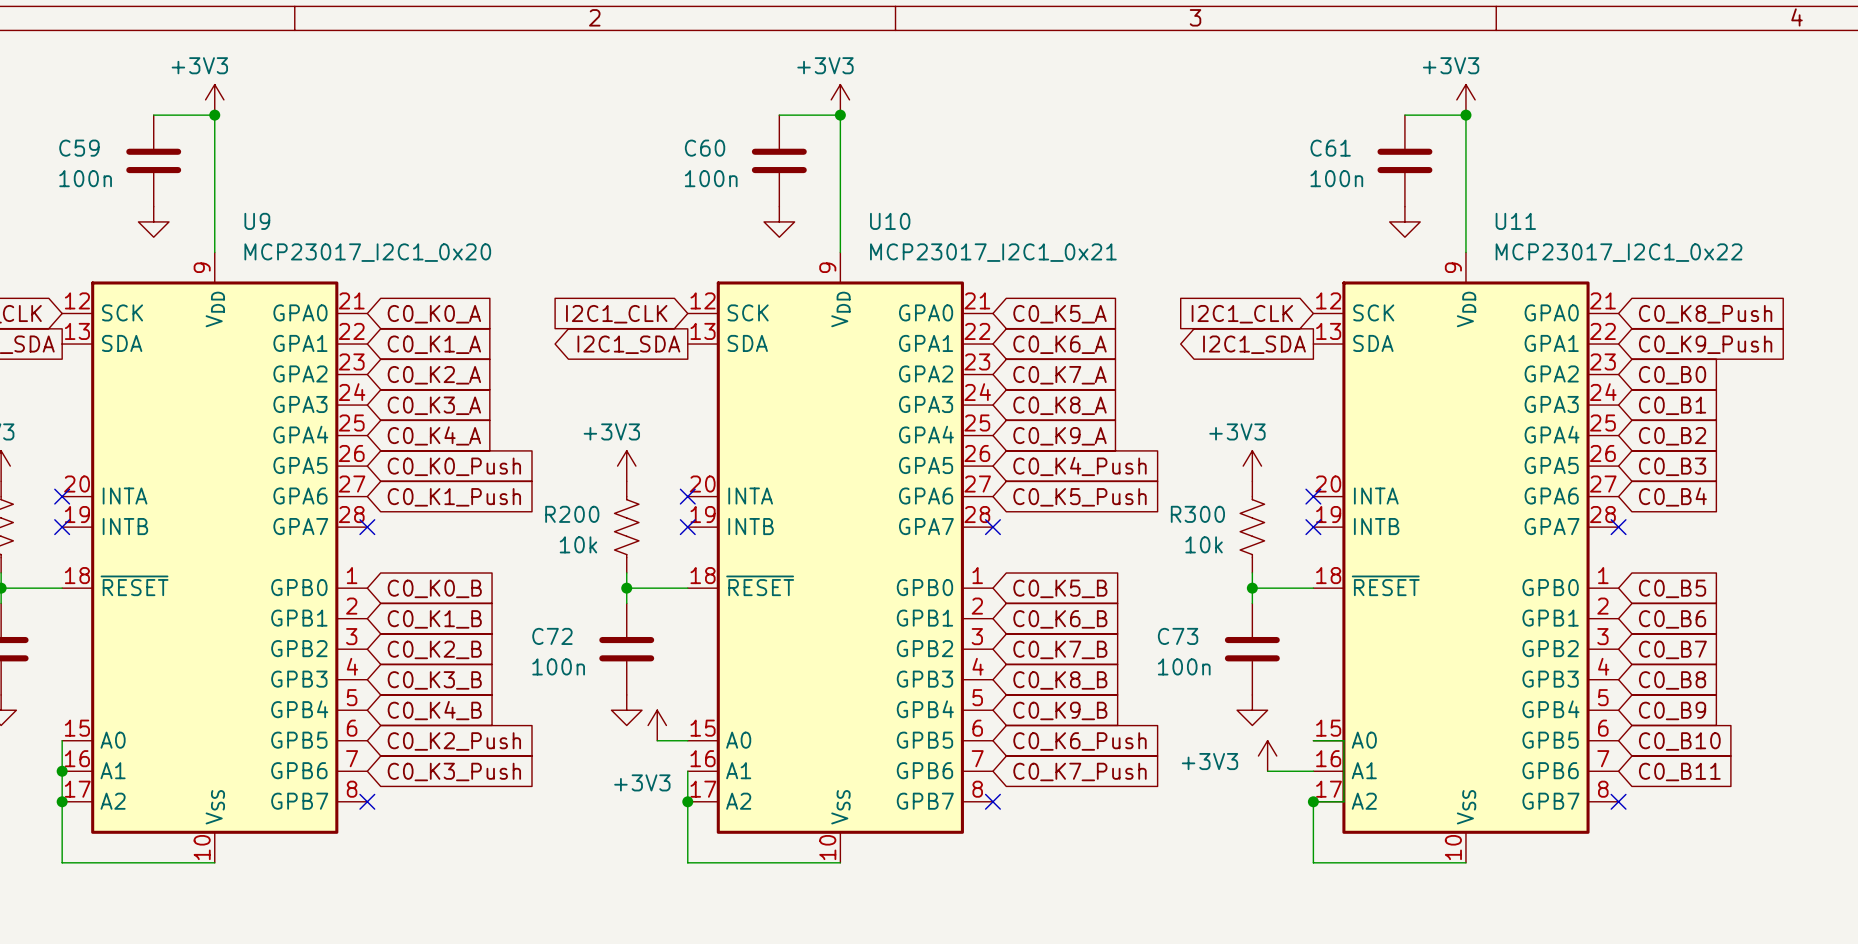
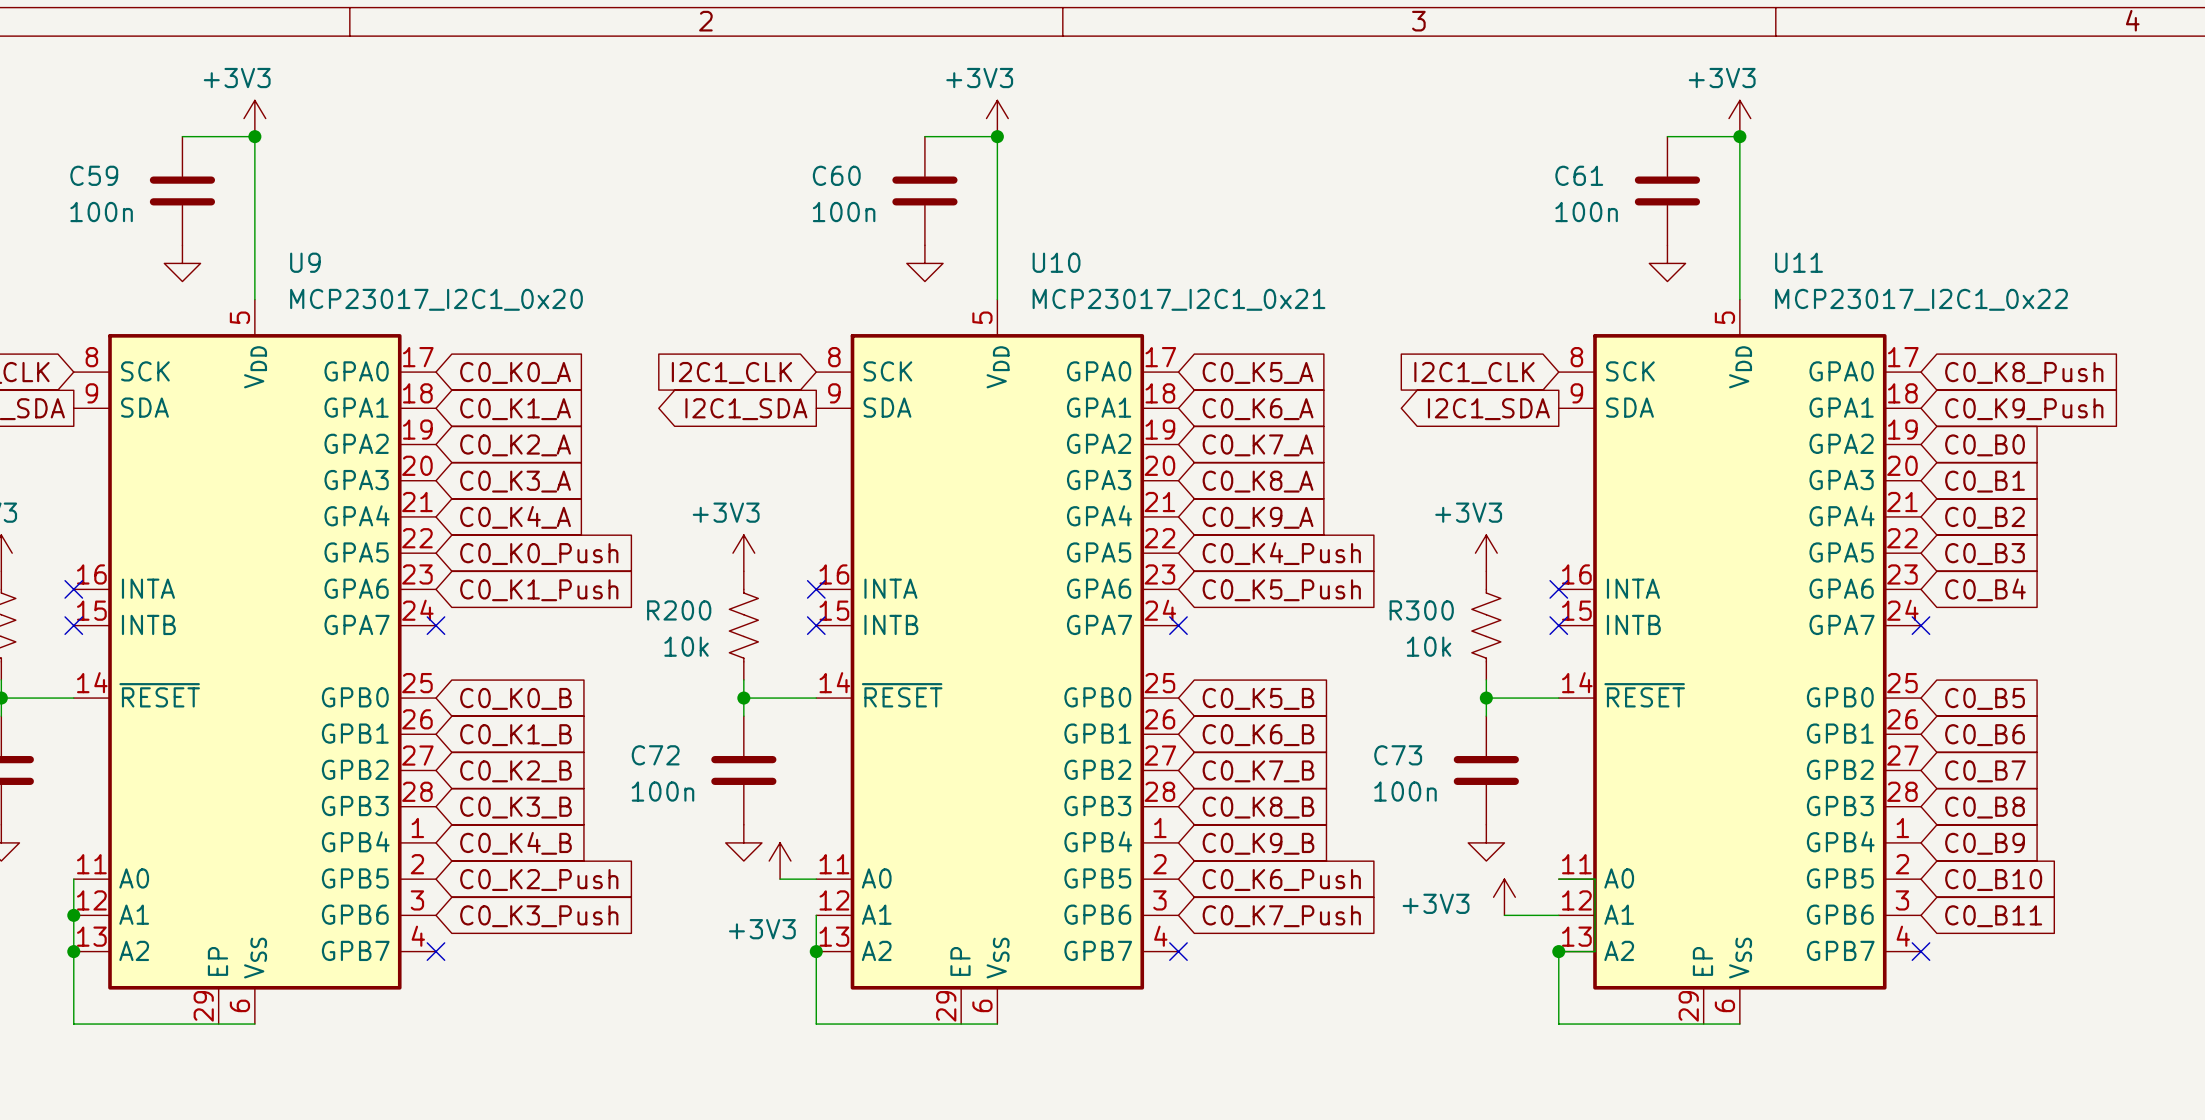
U9 symbol: [62, 252, 368, 863] -> [73, 299, 436, 1025]
U10 symbol: [687, 252, 993, 863] -> [816, 299, 1179, 1025]
U11 symbol: [1313, 252, 1619, 863] -> [1558, 299, 1921, 1025]

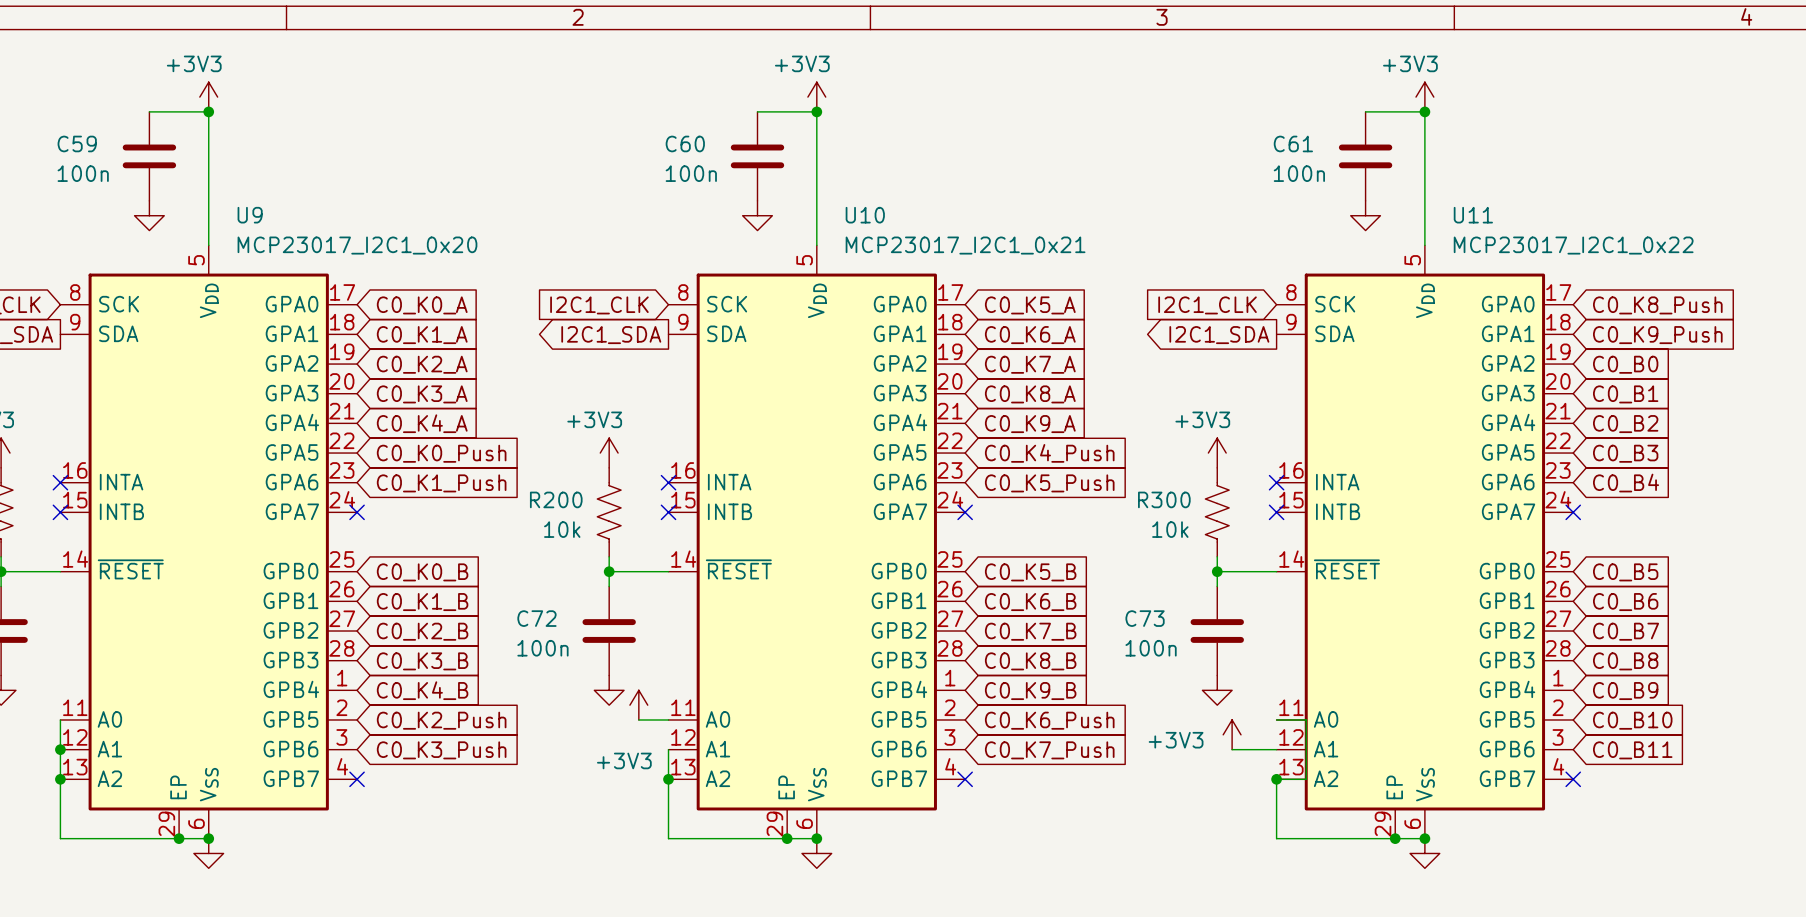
junction: none -> (179, 838)
junction: none -> (208, 838)
junction: none -> (787, 838)
junction: none -> (816, 838)
junction: none -> (1395, 838)
junction: none -> (1424, 838)
power symbol: none -> (208, 853)
power symbol: none -> (816, 853)
power symbol: none -> (1424, 853)

